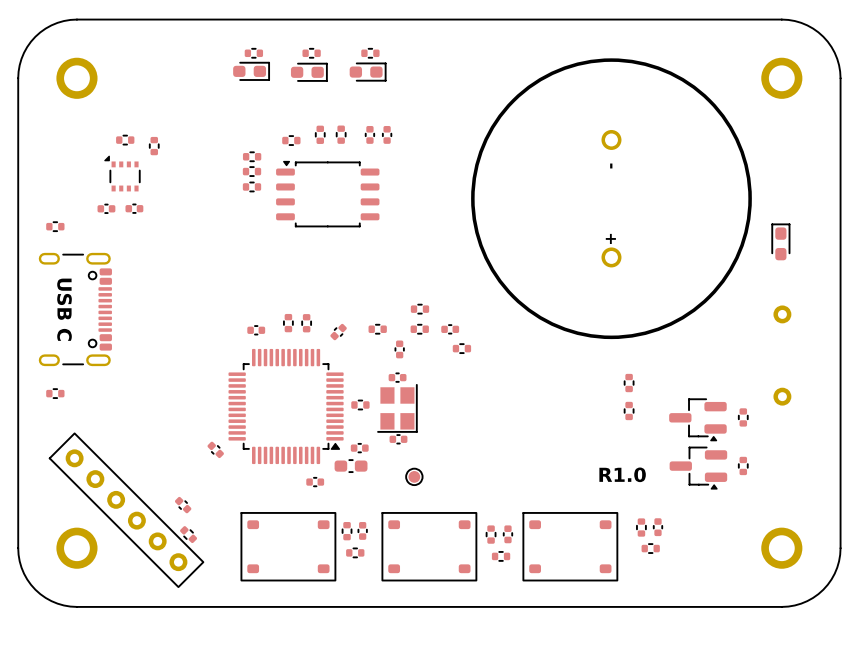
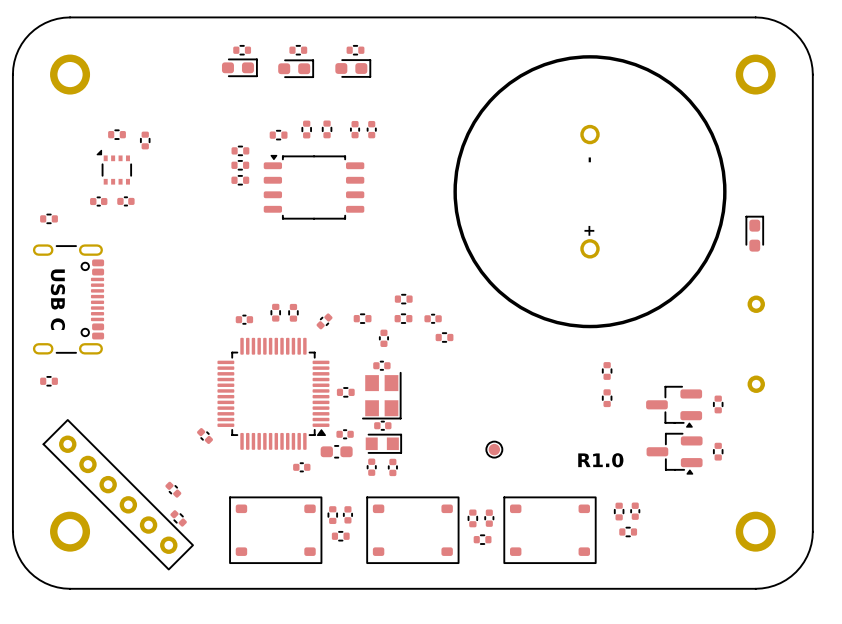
part: none -> (383, 443)
part: none -> (494, 449)
part footprint: [405, 467, 424, 486] -> [388, 458, 398, 477]
part: none -> (371, 467)

